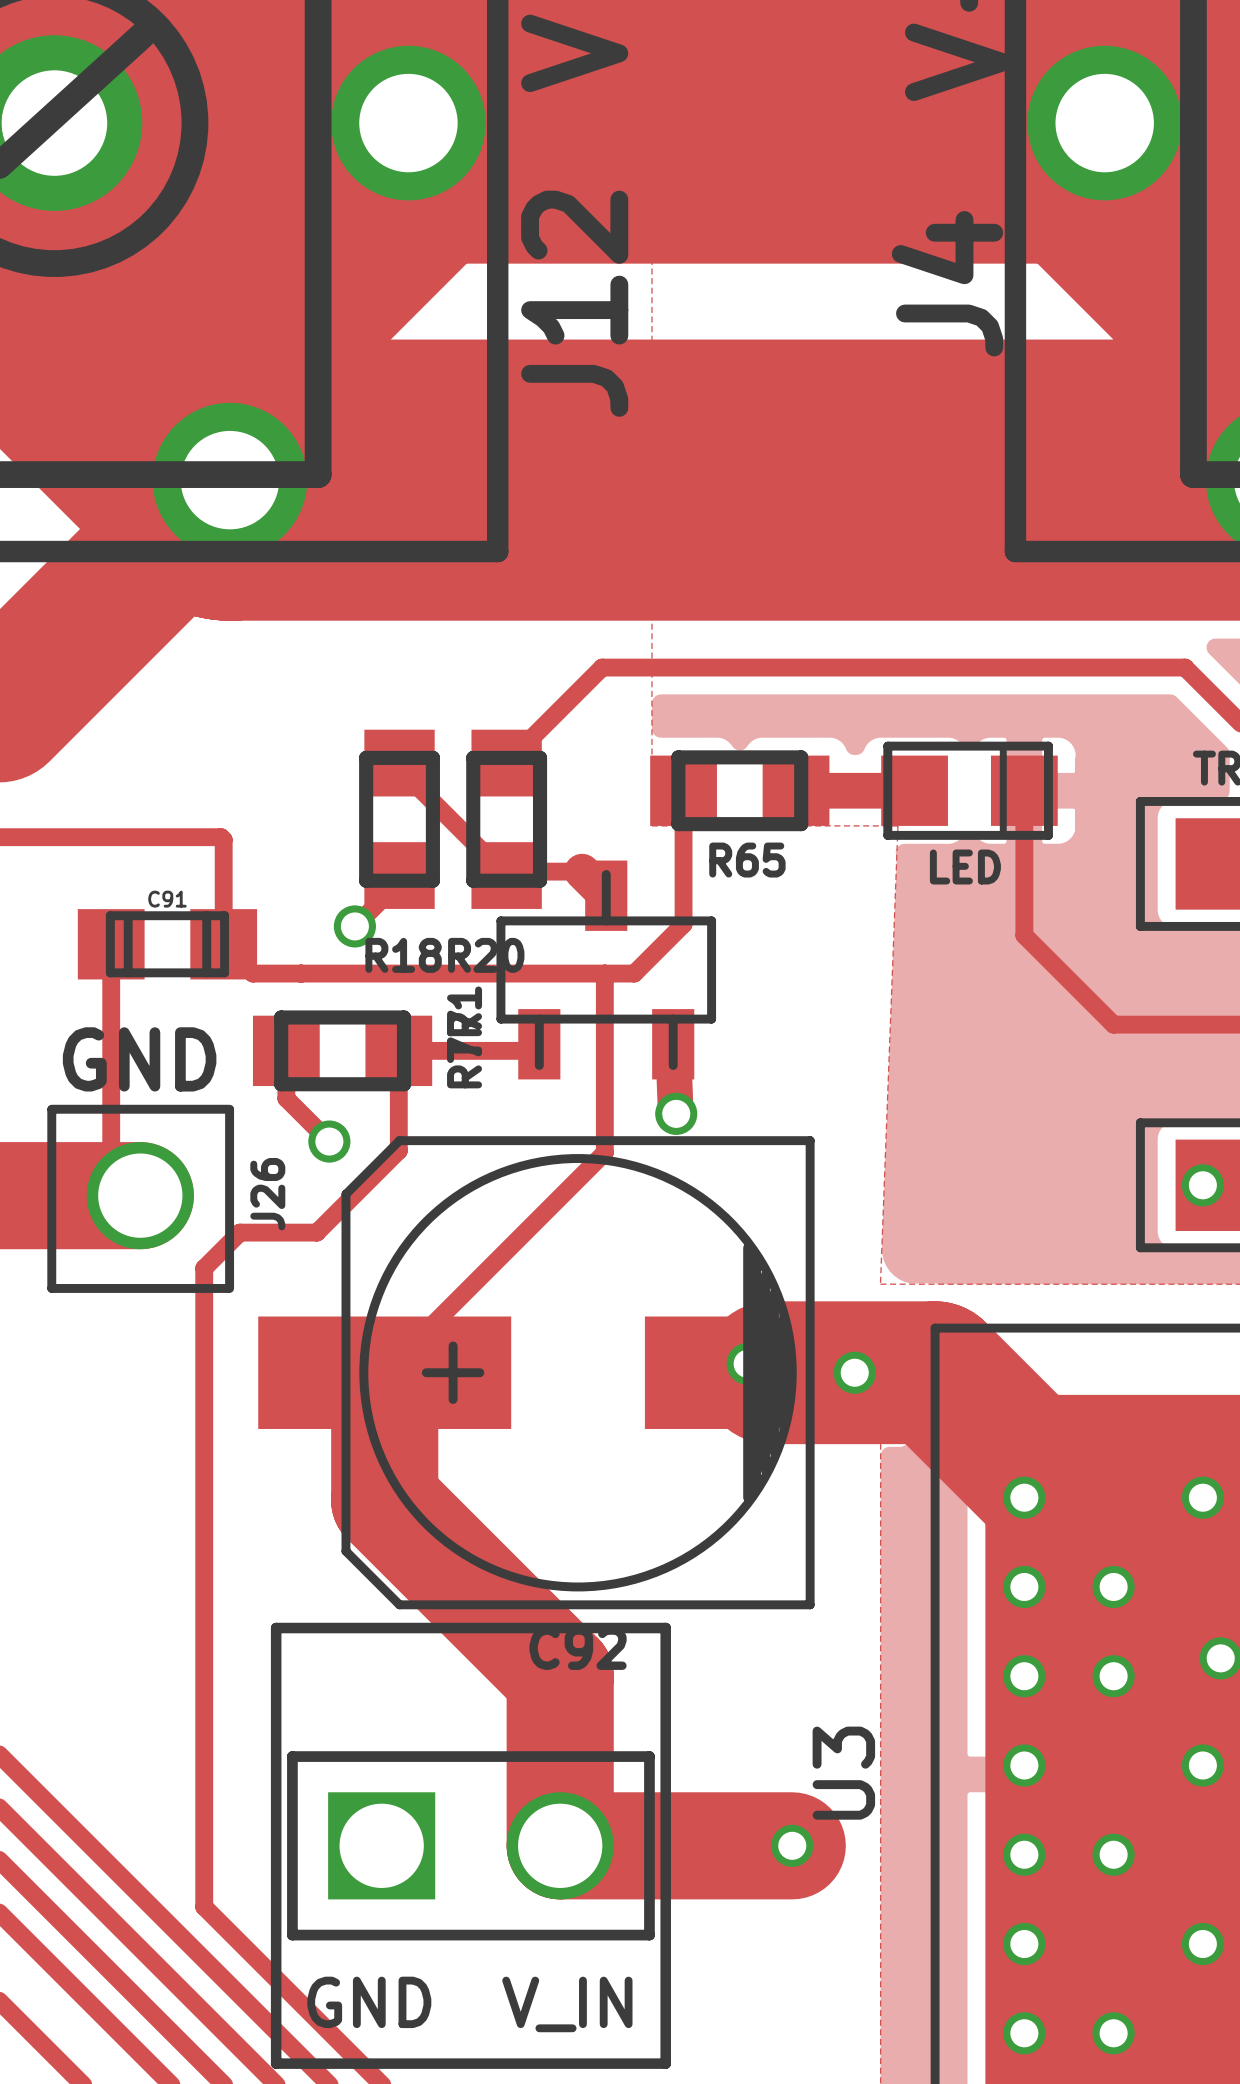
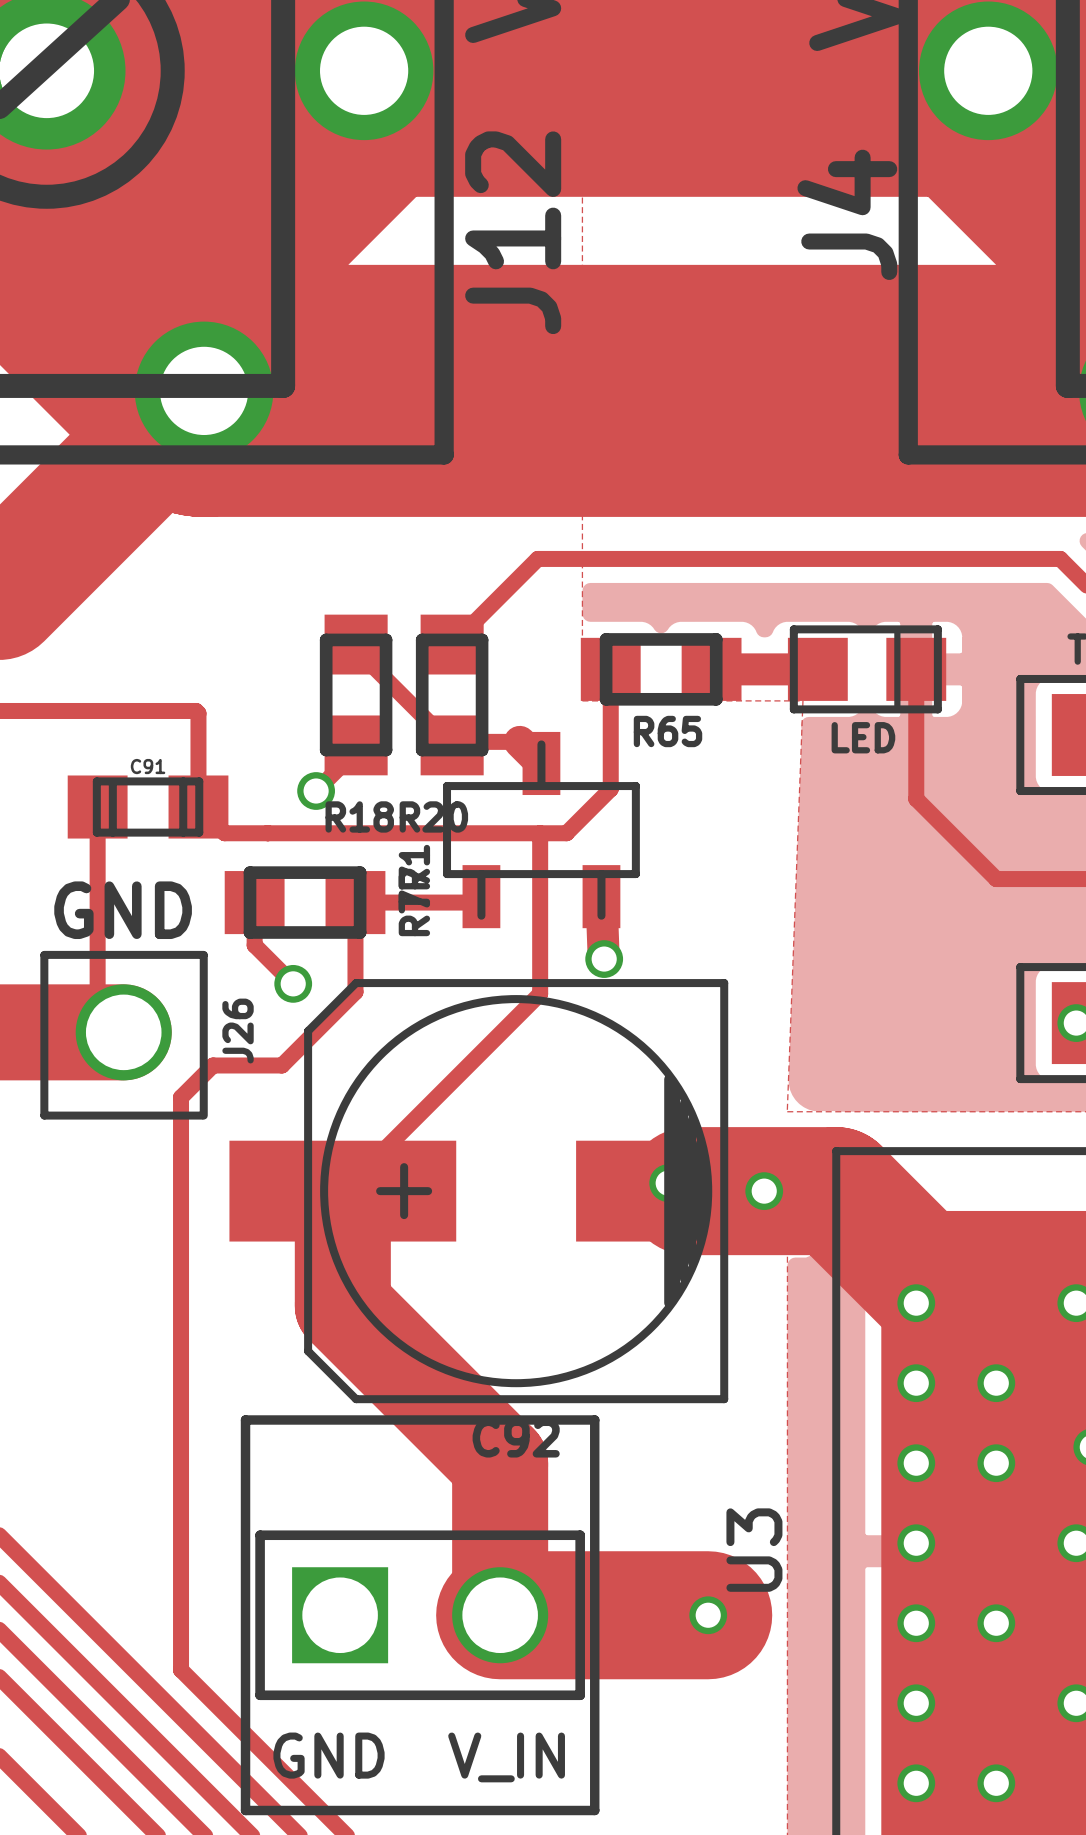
track width: thin (560, 1845) (792, 1845) -> thick (500, 1615) (708, 1615)

